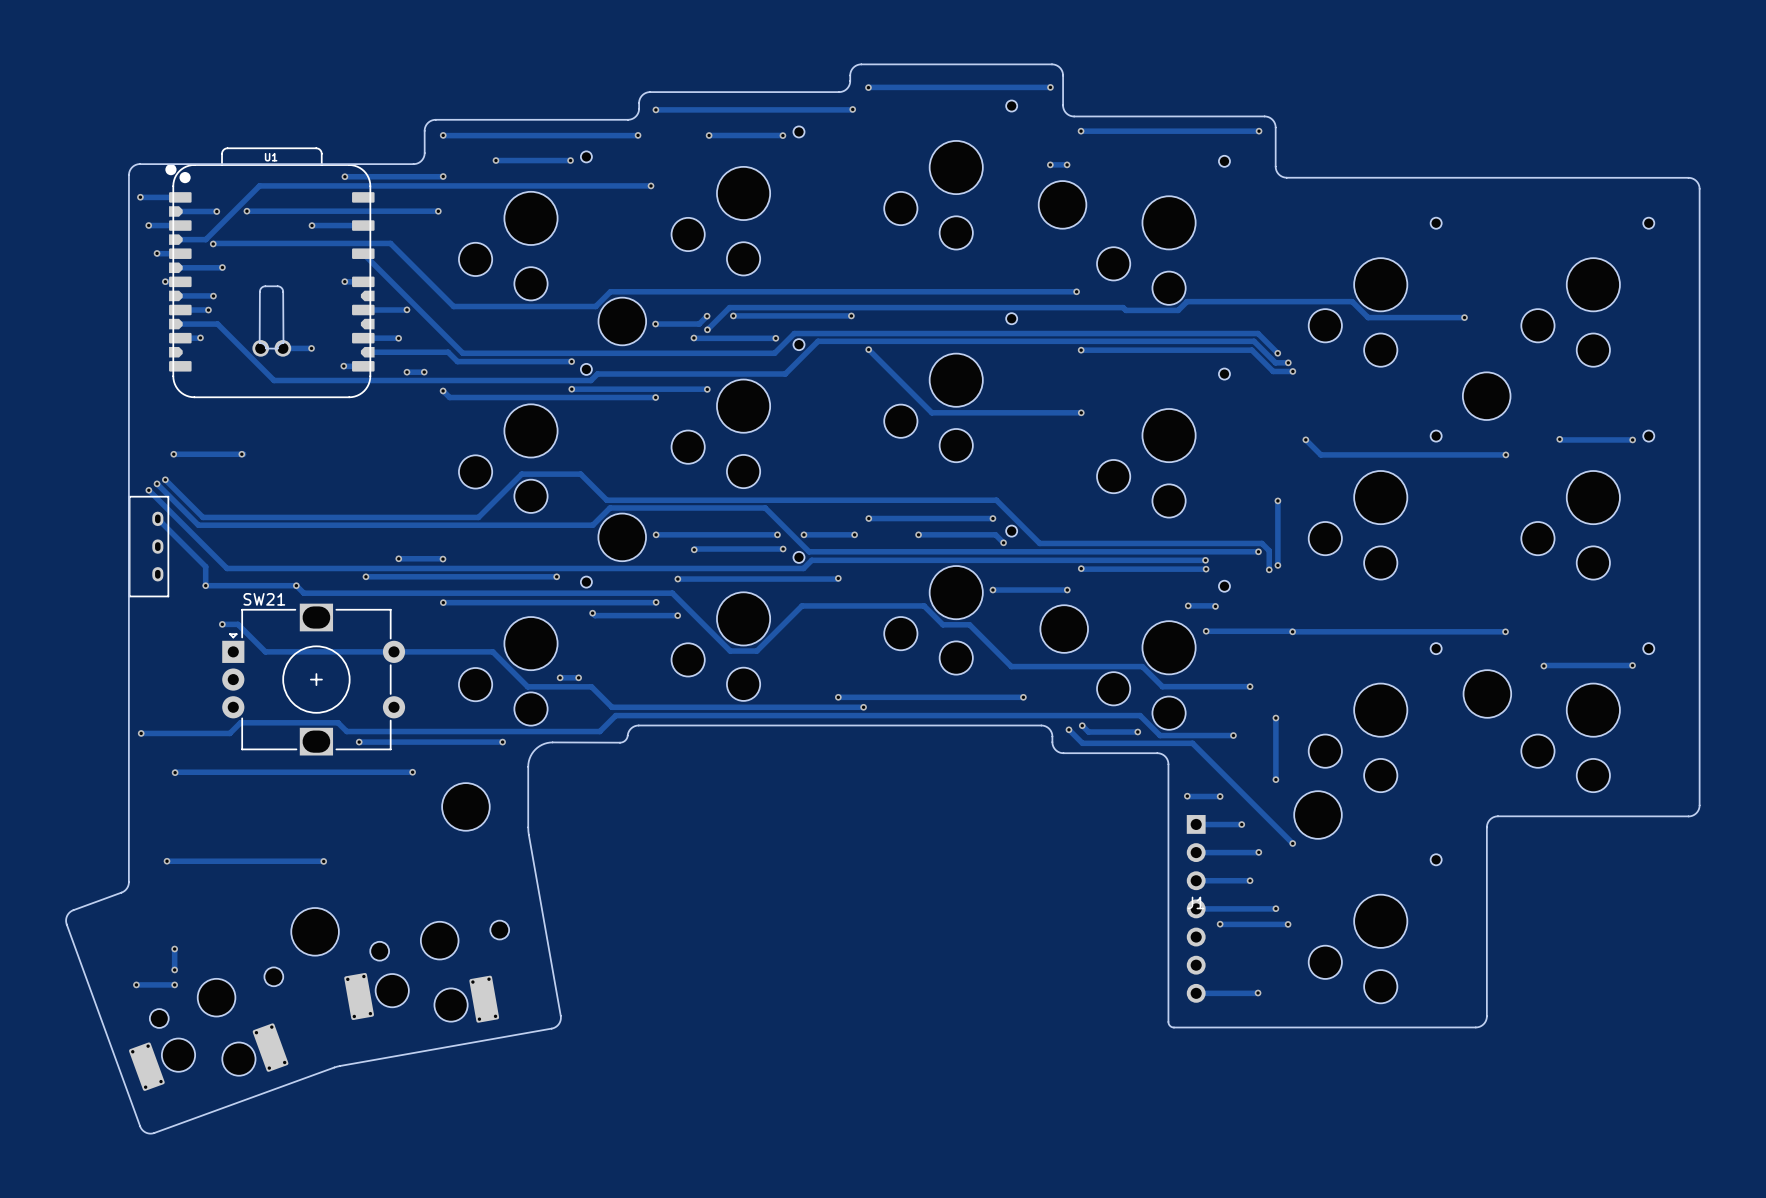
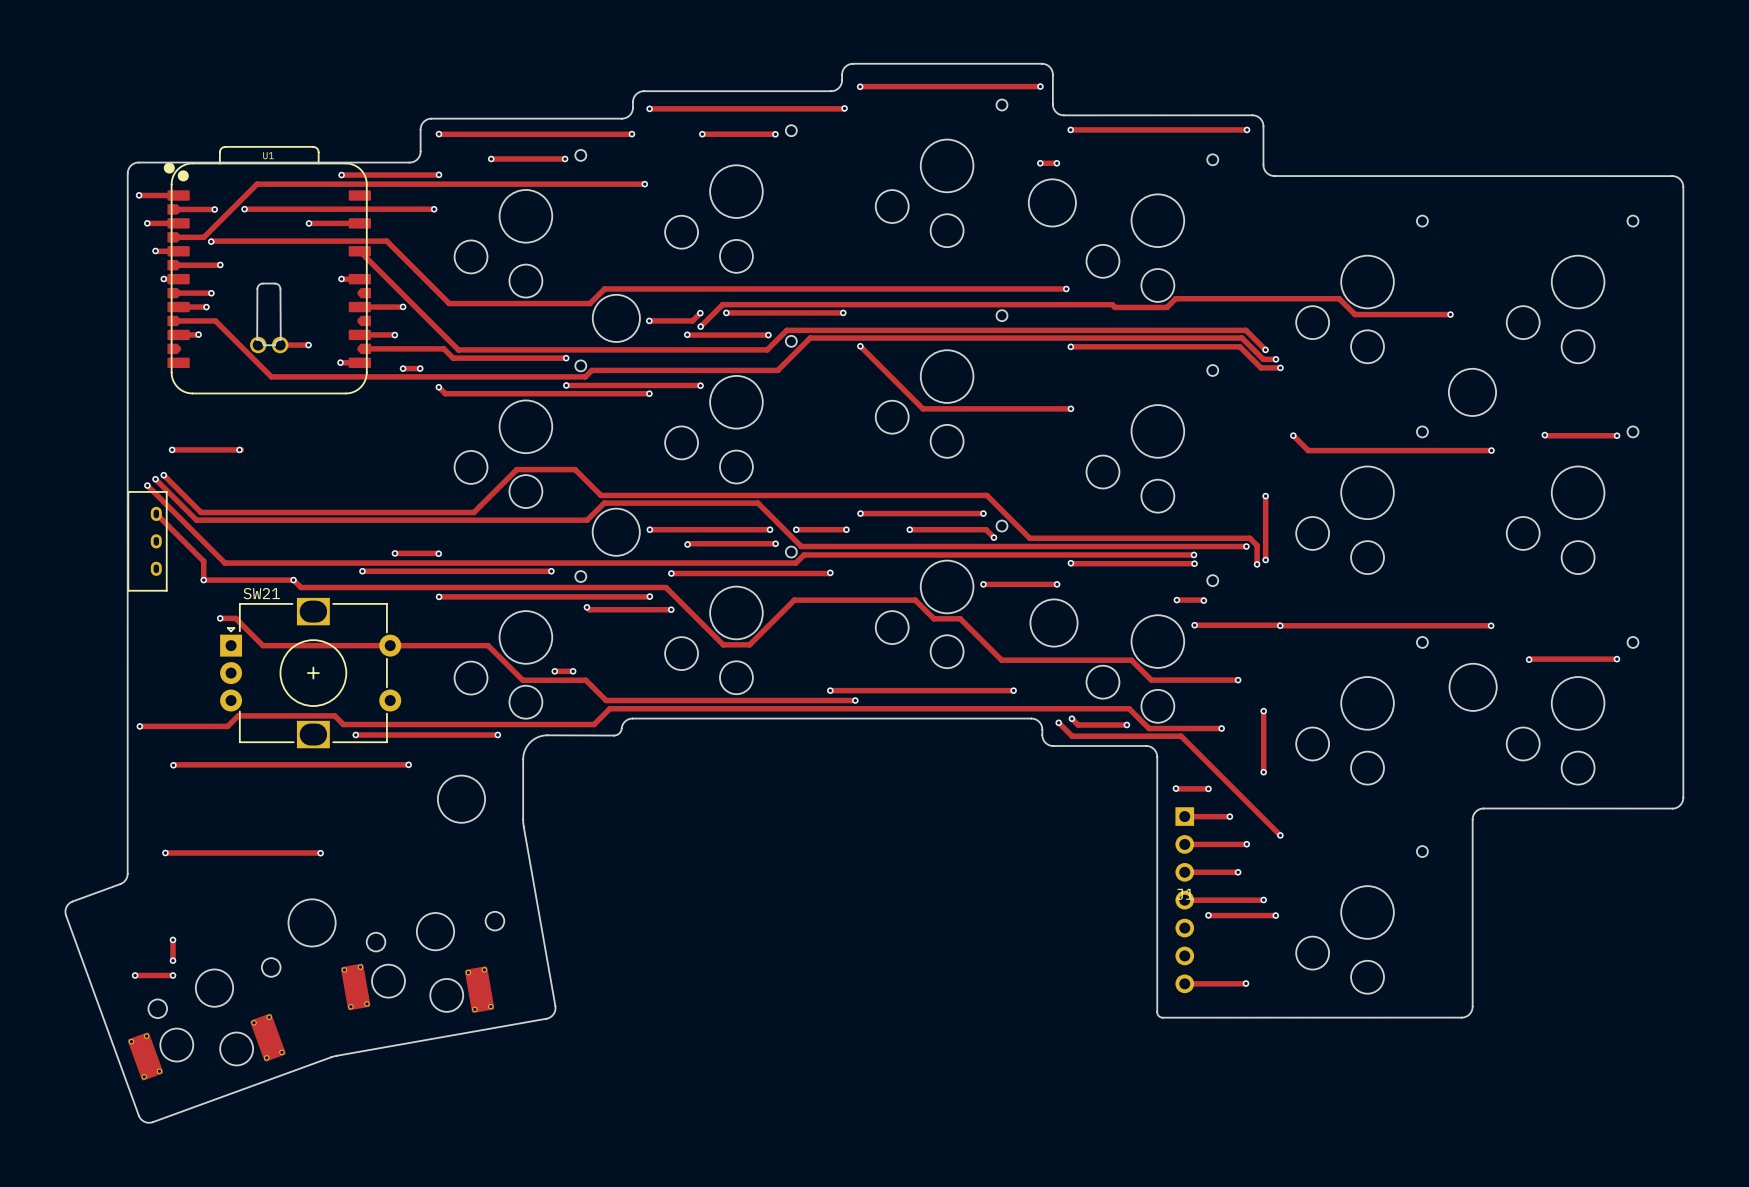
part: (1318, 815) -> none

